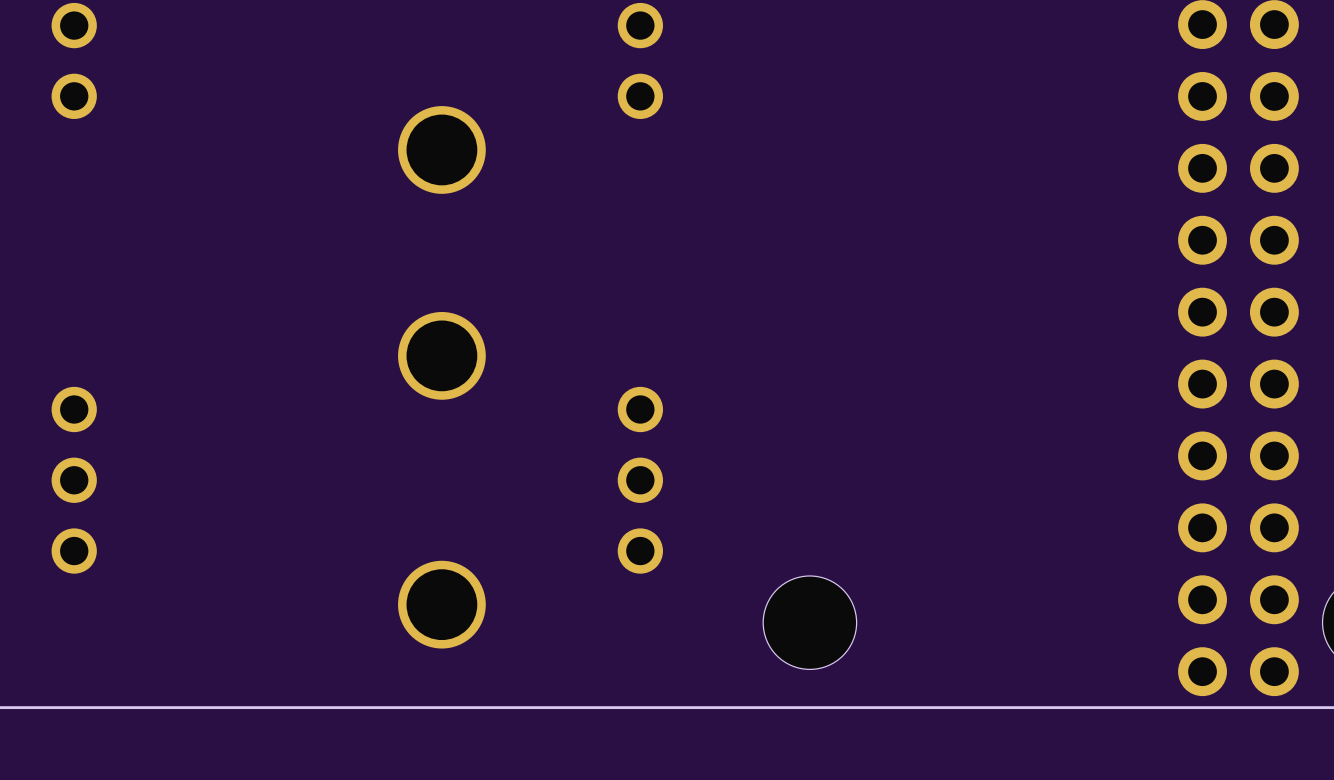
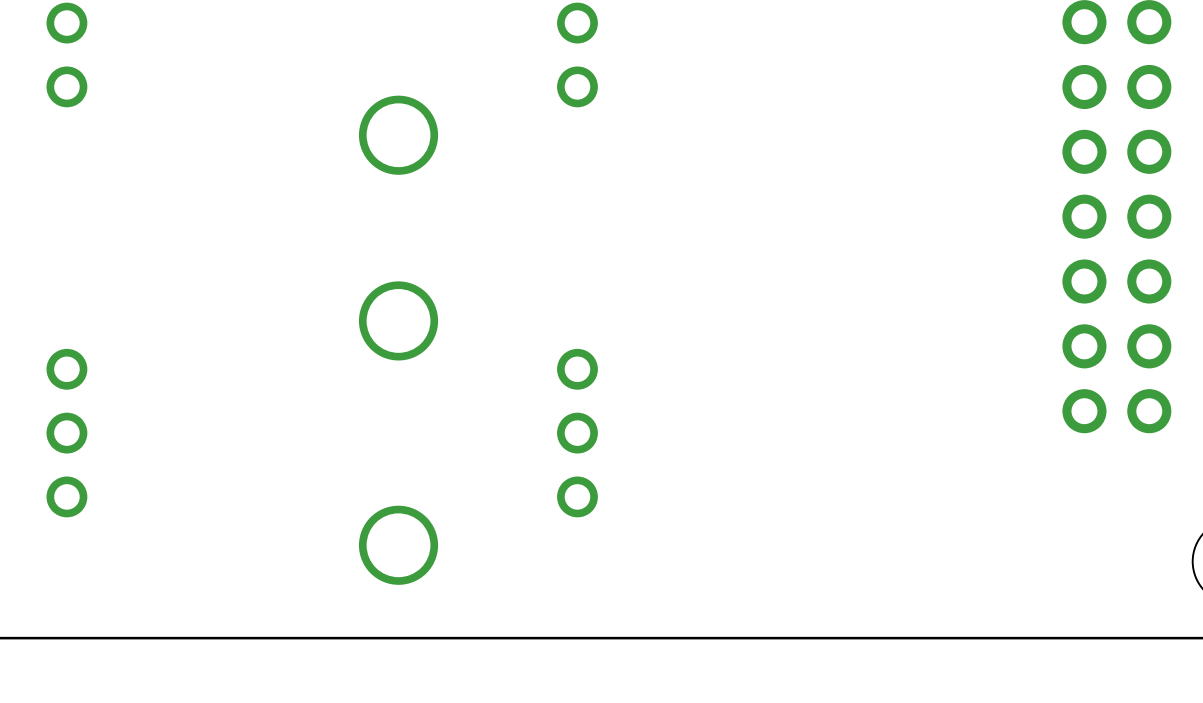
part: (1202, 527) -> none
part: (1274, 527) -> none
part: (1202, 599) -> none
part: (1274, 599) -> none
part: (809, 622) -> none
part: (1202, 671) -> none
part: (1274, 671) -> none

